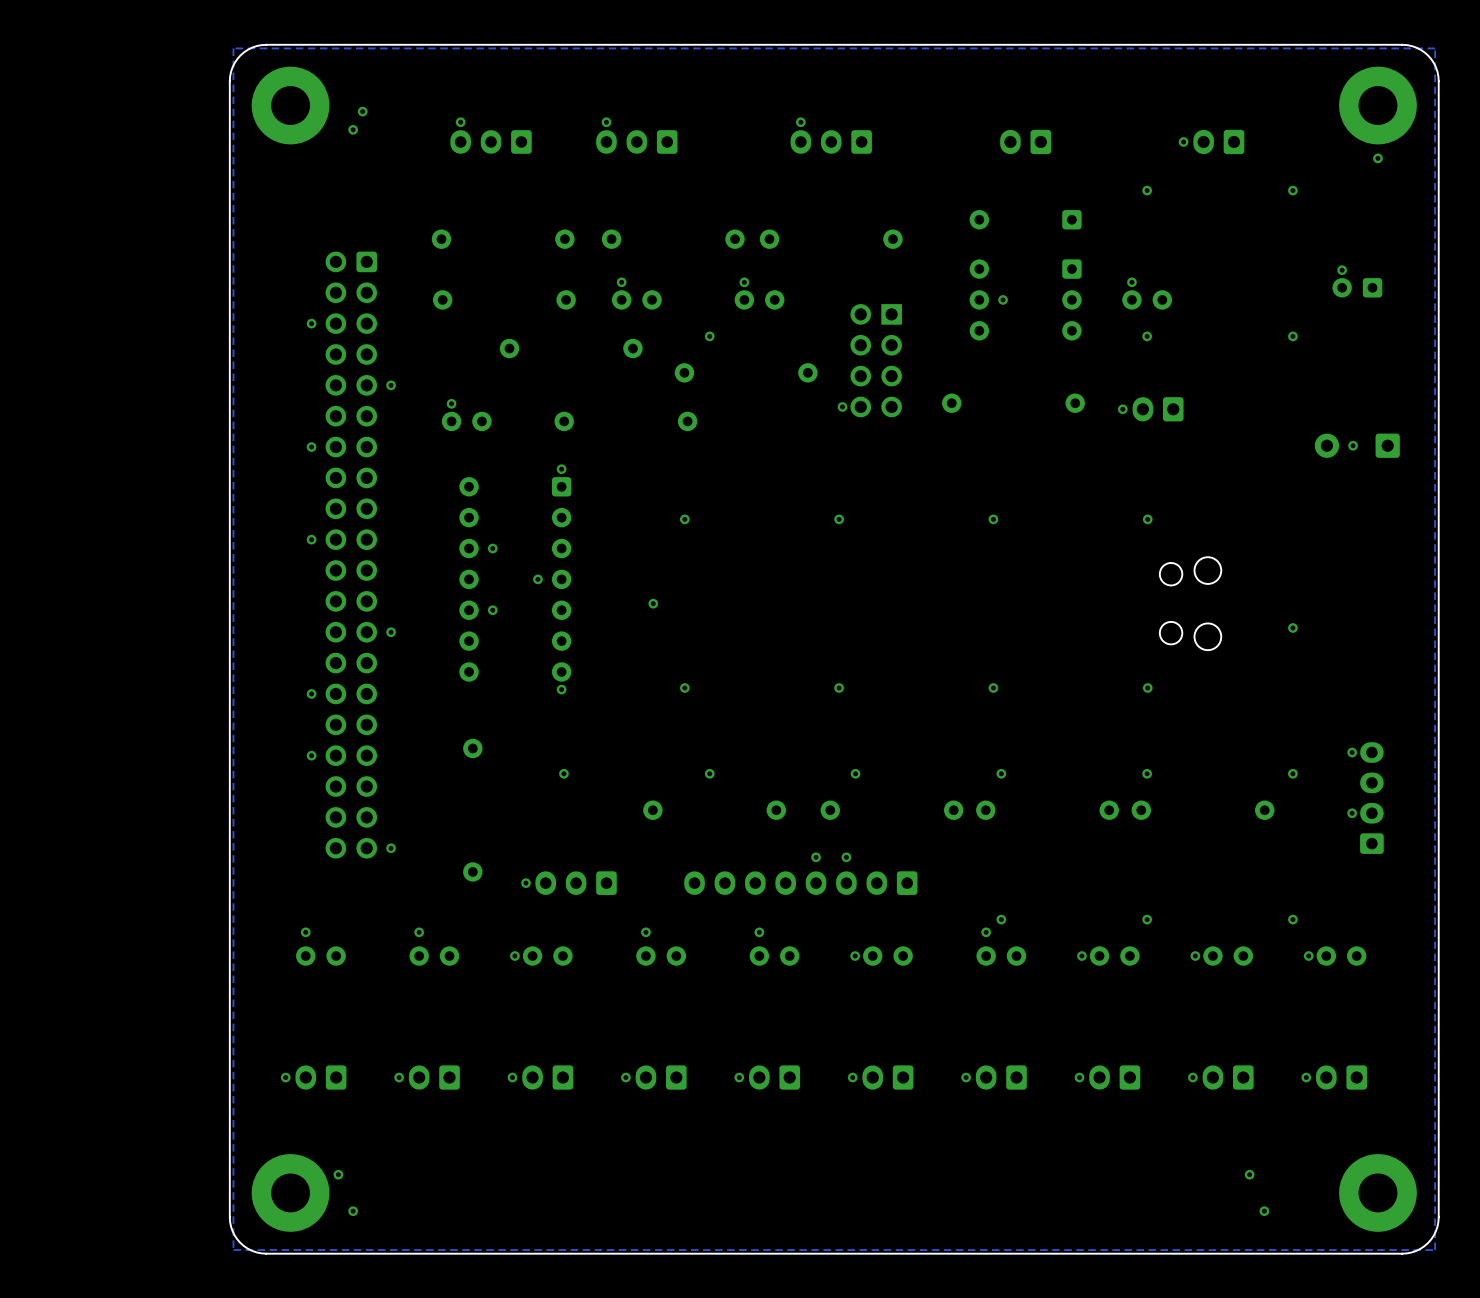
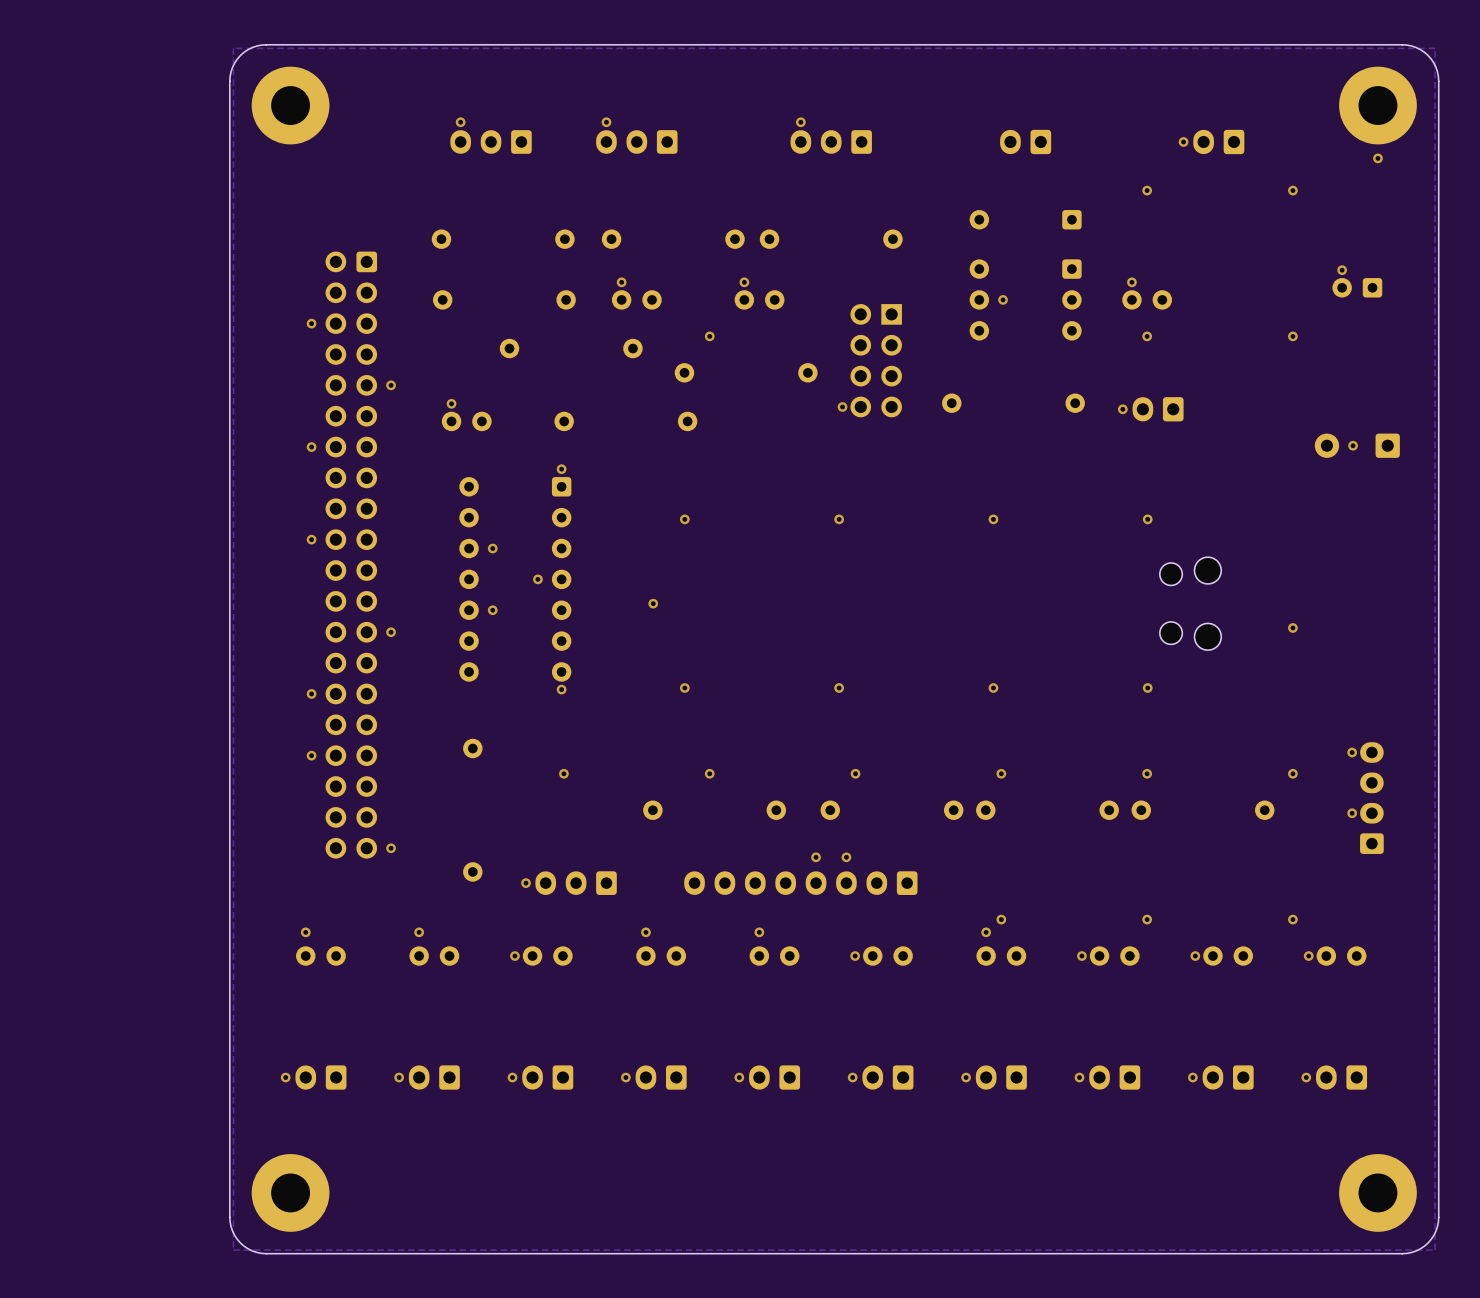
via: (362, 111) -> none
via: (353, 129) -> none
via: (338, 1174) -> none
via: (1249, 1174) -> none
via: (353, 1211) -> none
via: (1264, 1211) -> none

